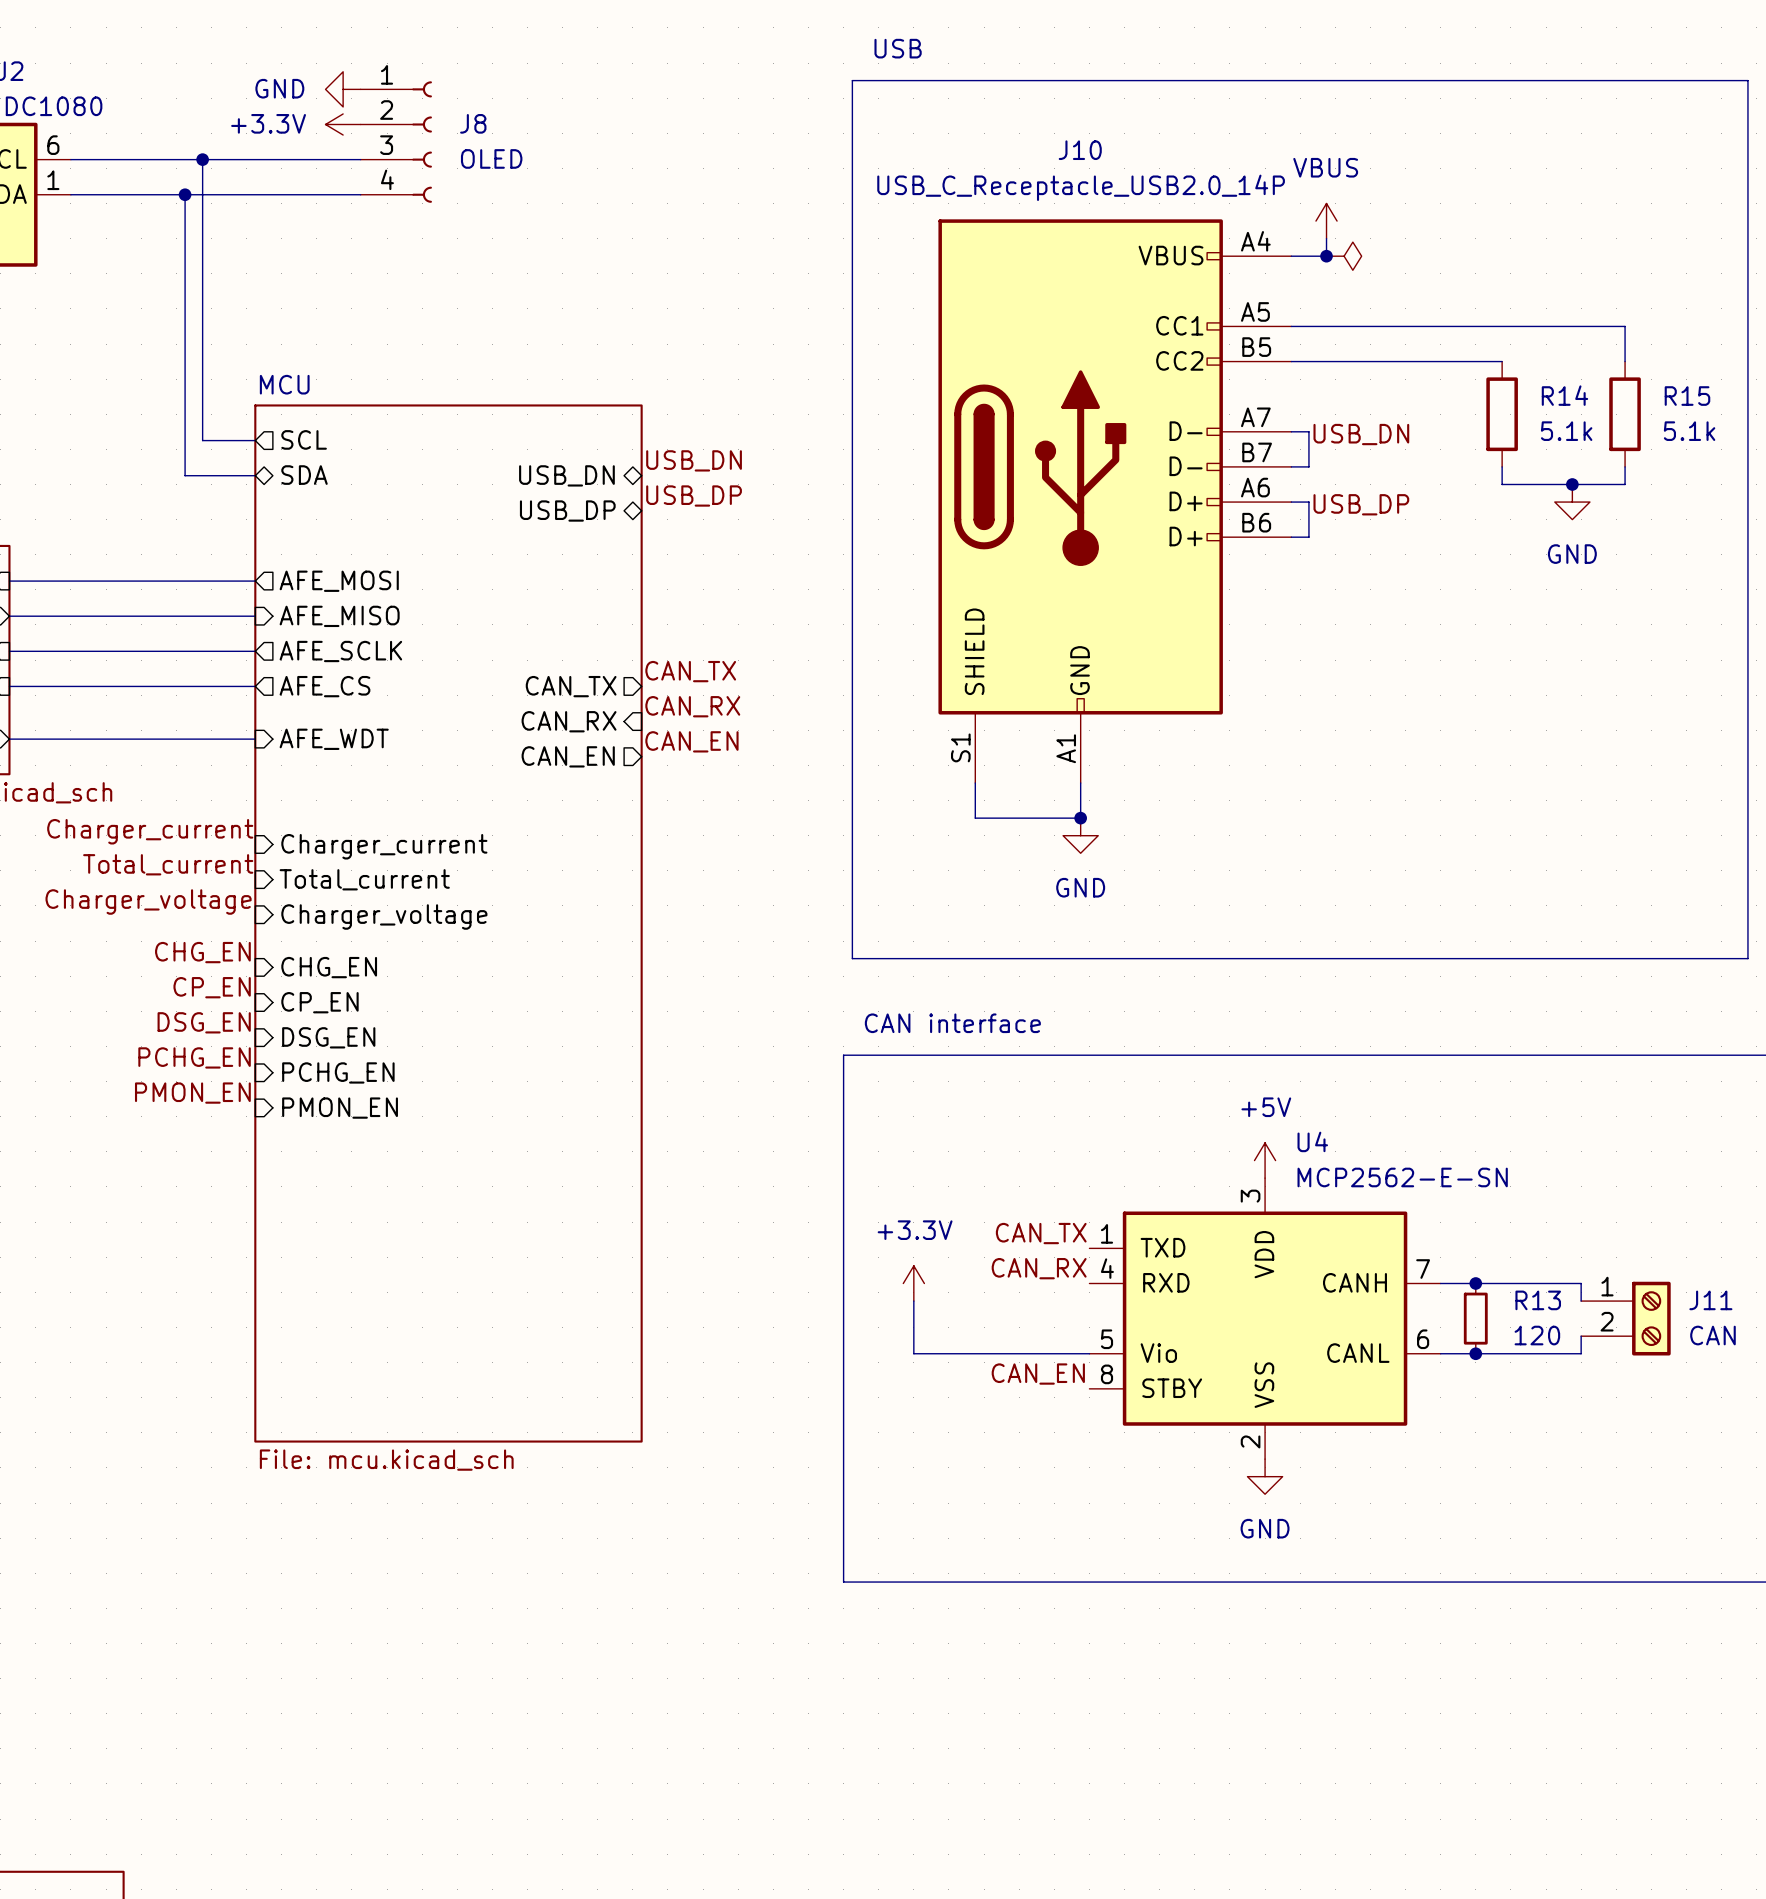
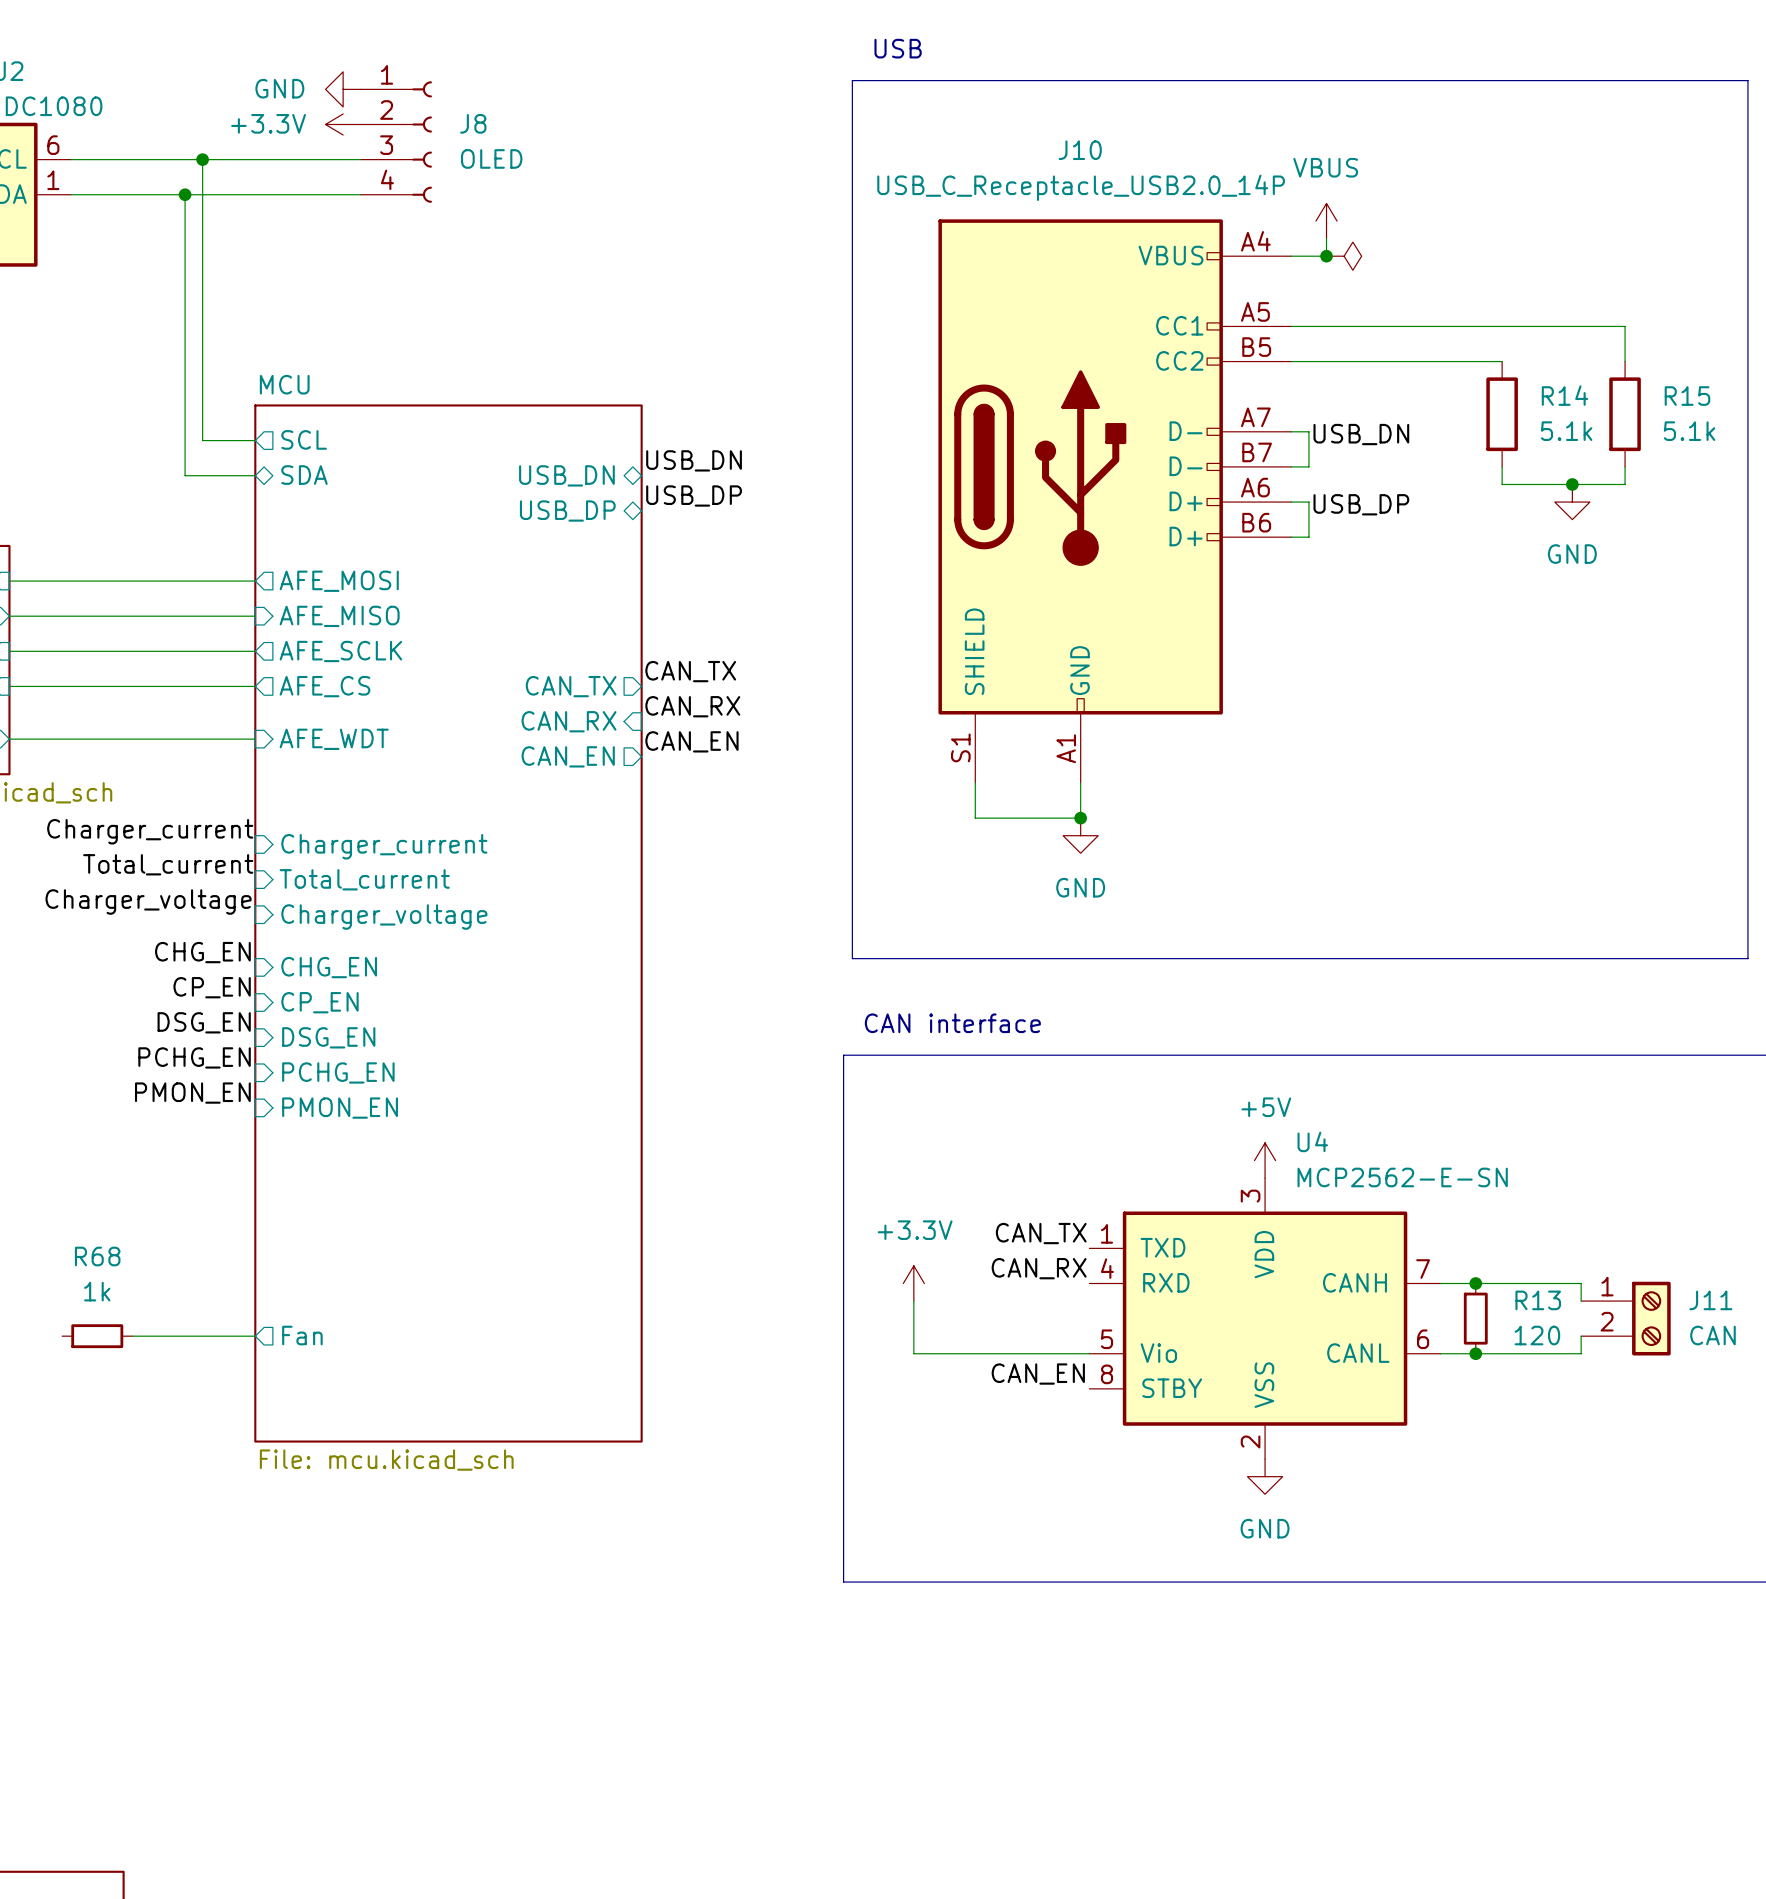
sheet pin: none -> Fan (302, 1335)
R68: none -> 1k (97, 1336)
wire: none -> (132, 1336) (255, 1336)

